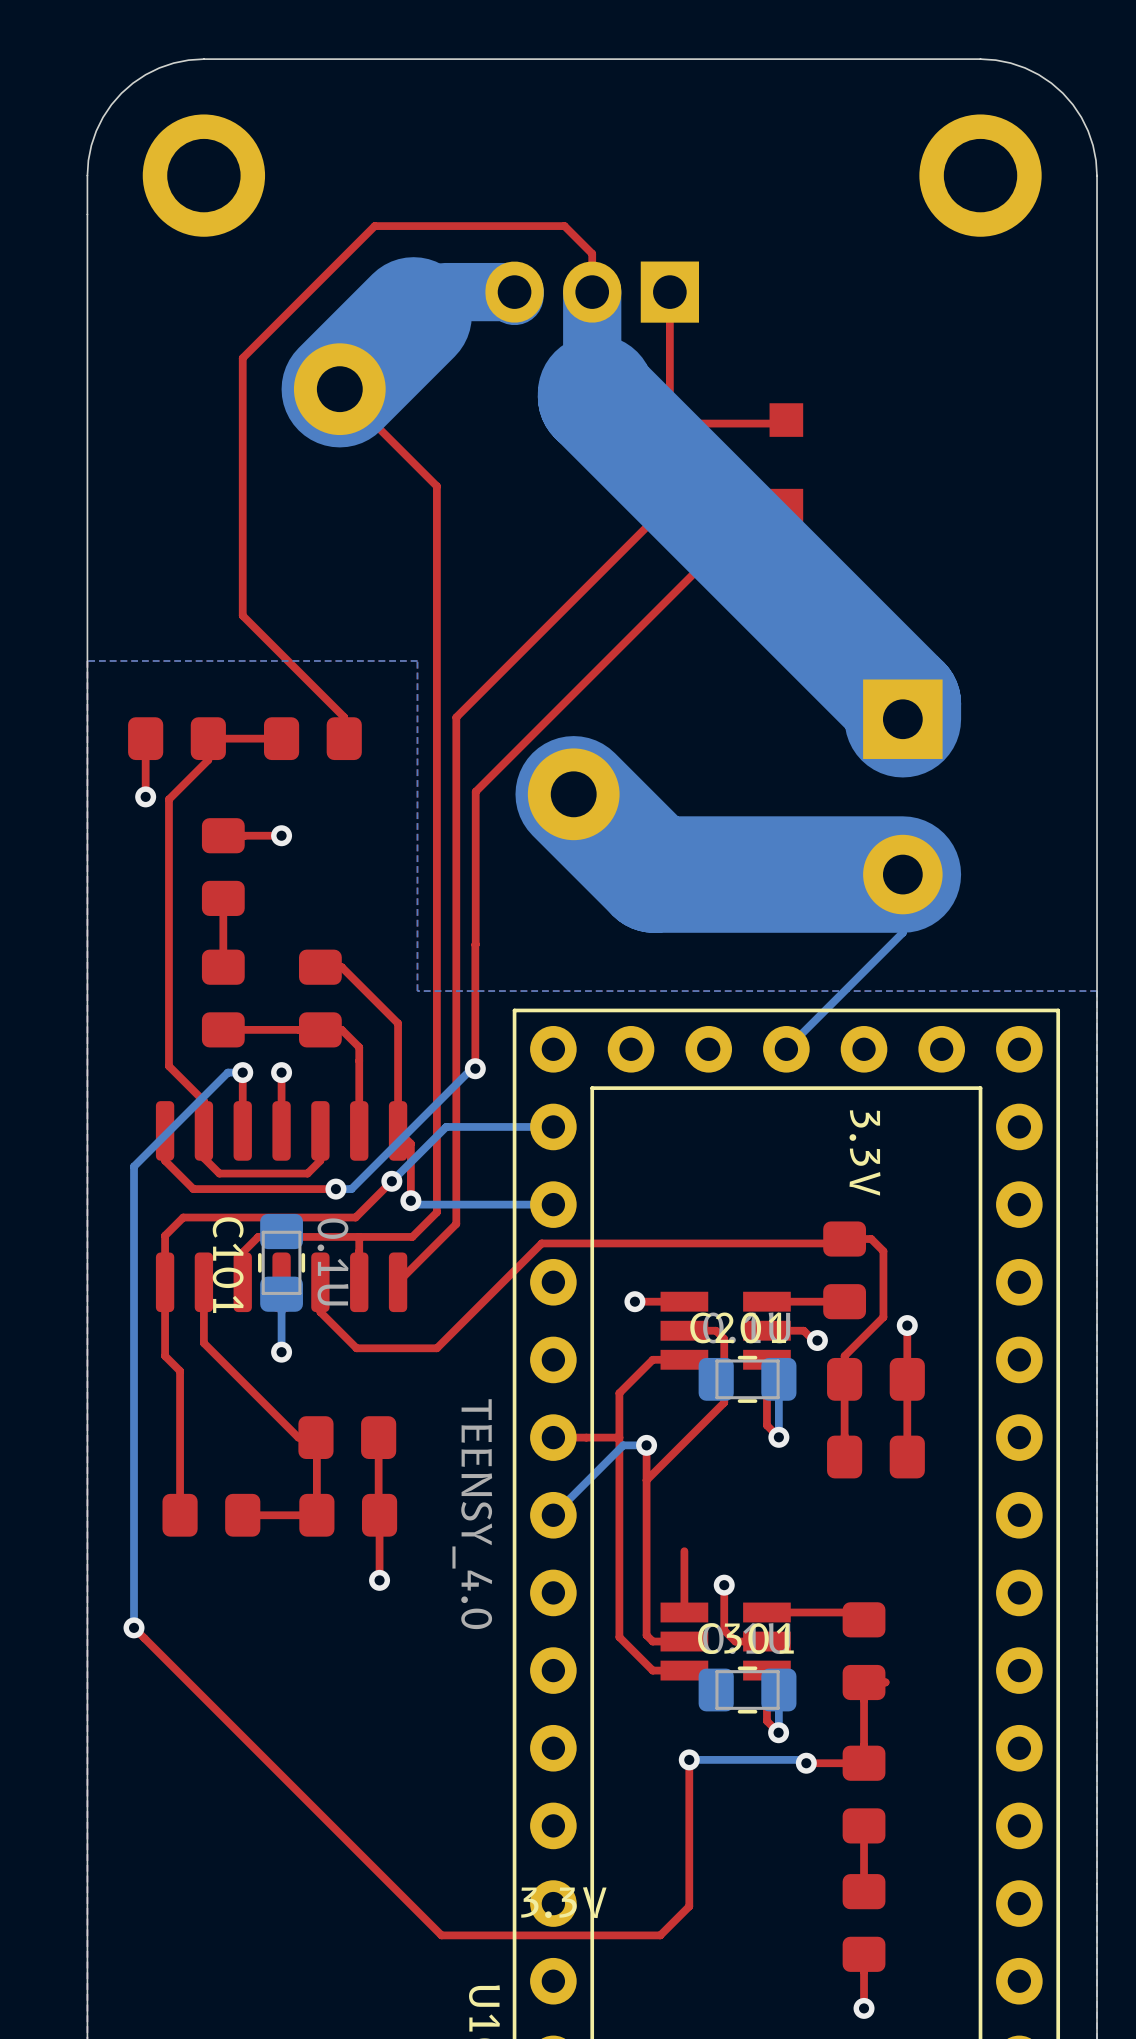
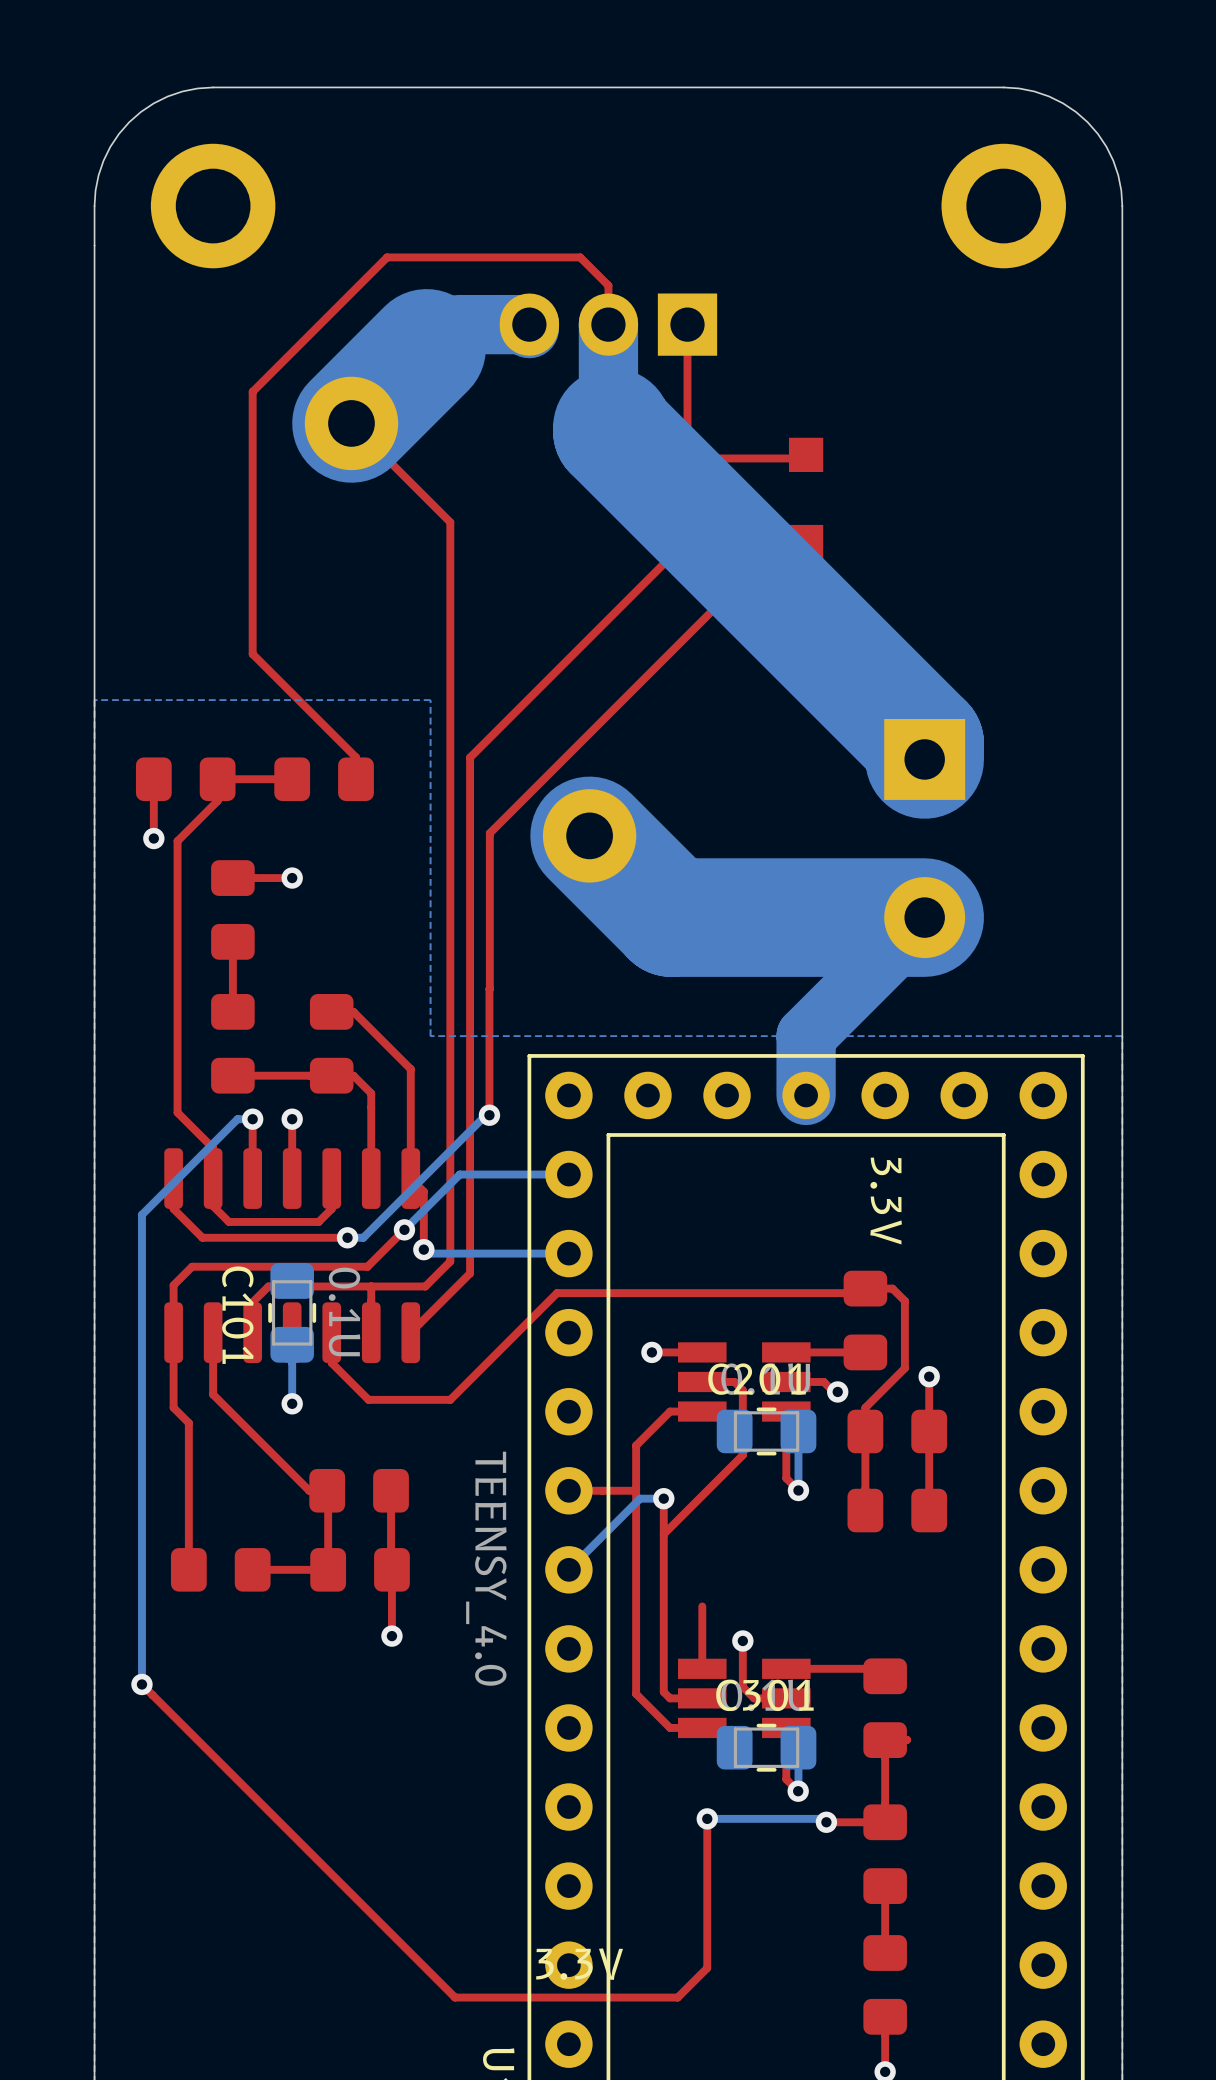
bottom track: (902, 874) (902, 932) (786, 1049) -> (924, 917) (806, 1036) (806, 1095)

